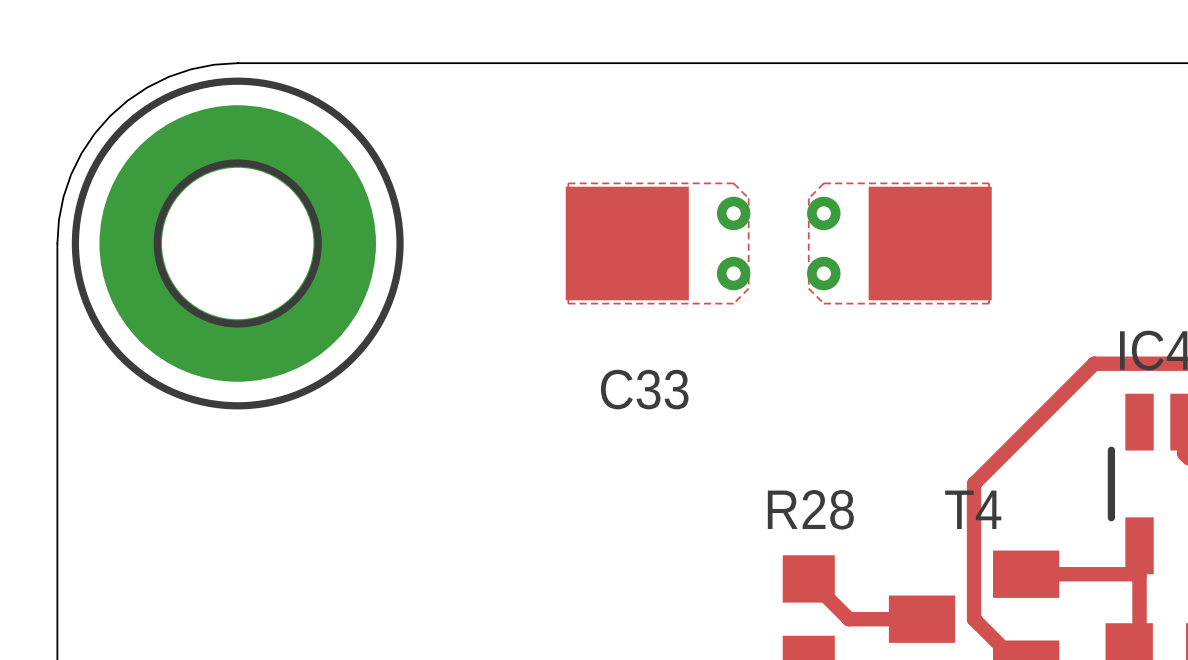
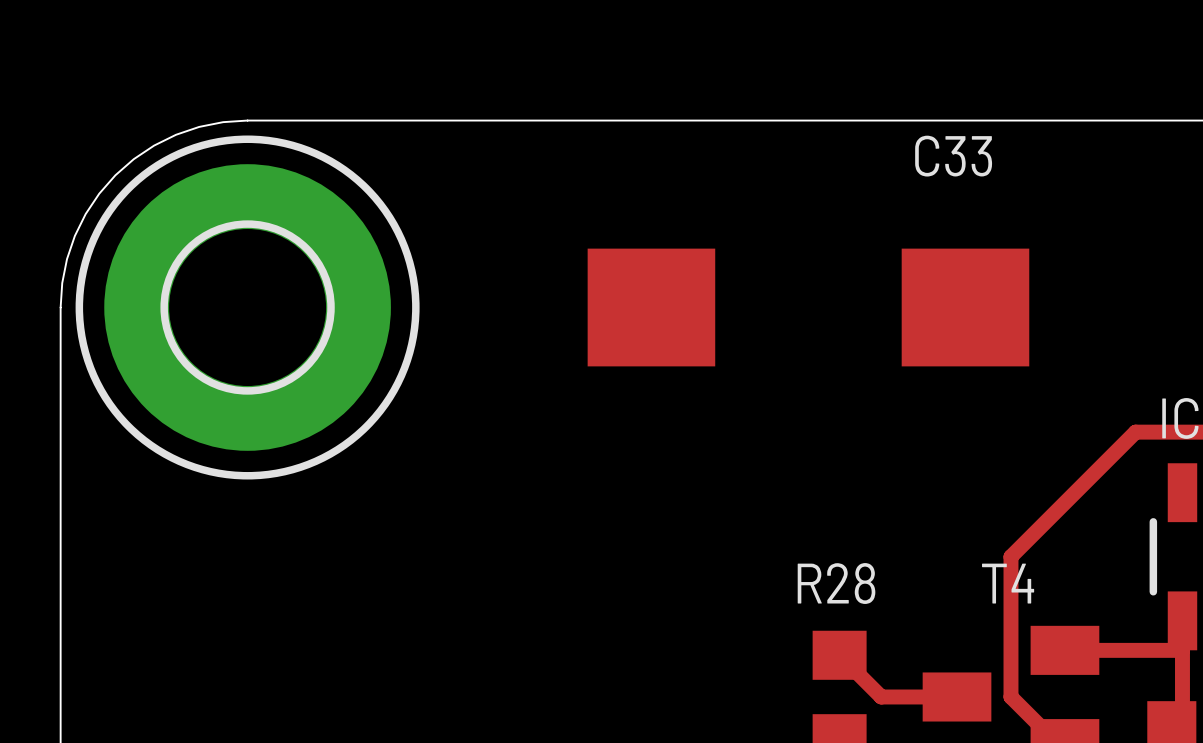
zone outline: (568, 183) (733, 183) (748, 198) (748, 288) (733, 303) (568, 303) (568, 183) -> none
zone outline: (823, 183) (989, 183) (989, 303) (823, 303) (808, 288) (808, 198) (823, 183) -> none
via: (733, 213) -> none
via: (823, 213) -> none
via: (733, 273) -> none
via: (823, 273) -> none
C33 name position: C33 (644, 389) -> C33 (953, 156)

